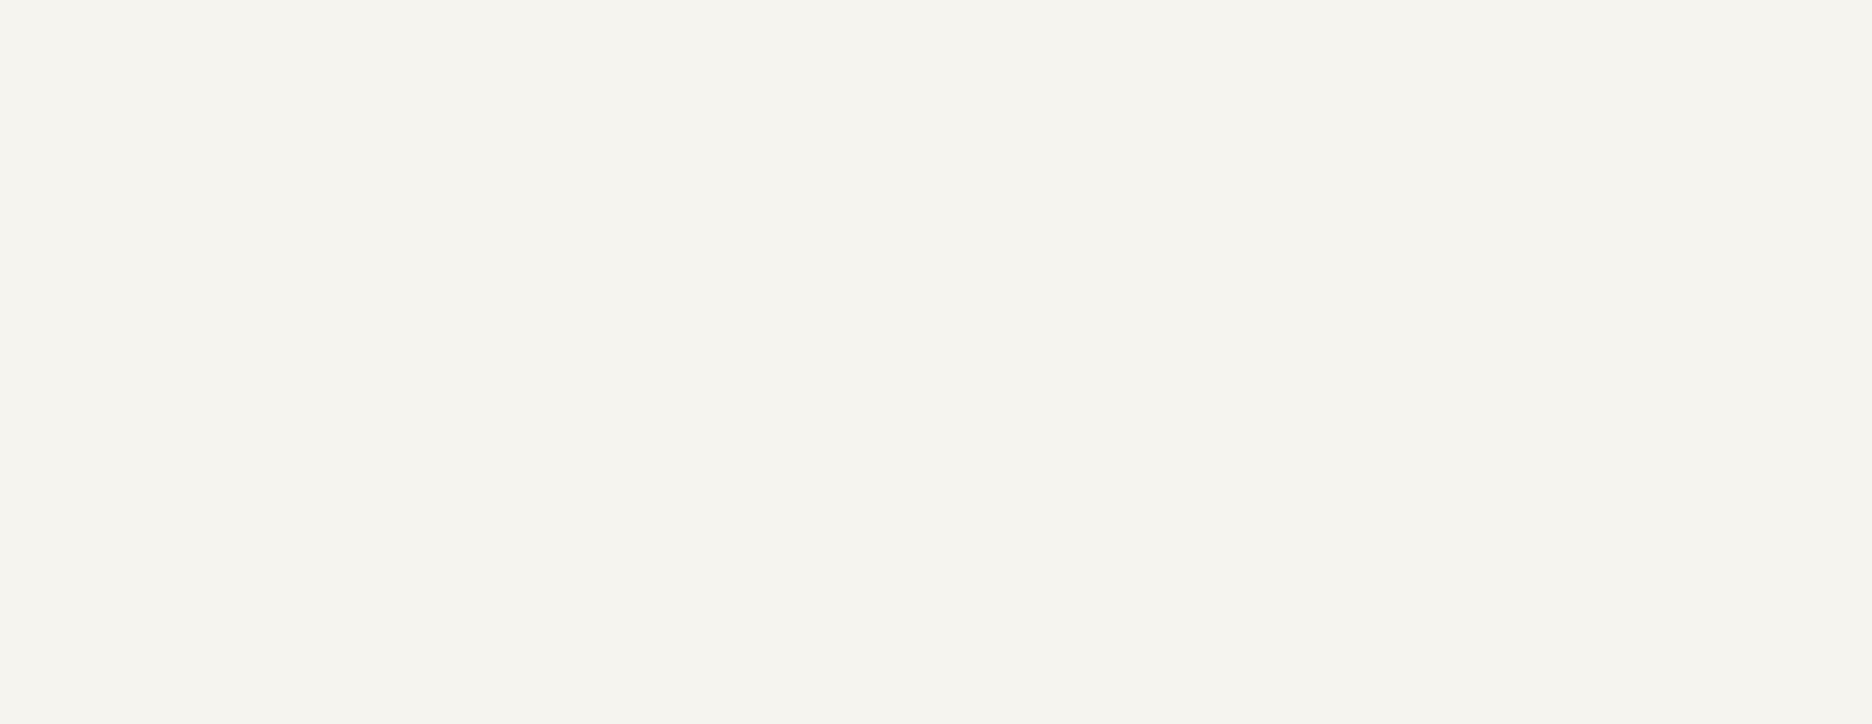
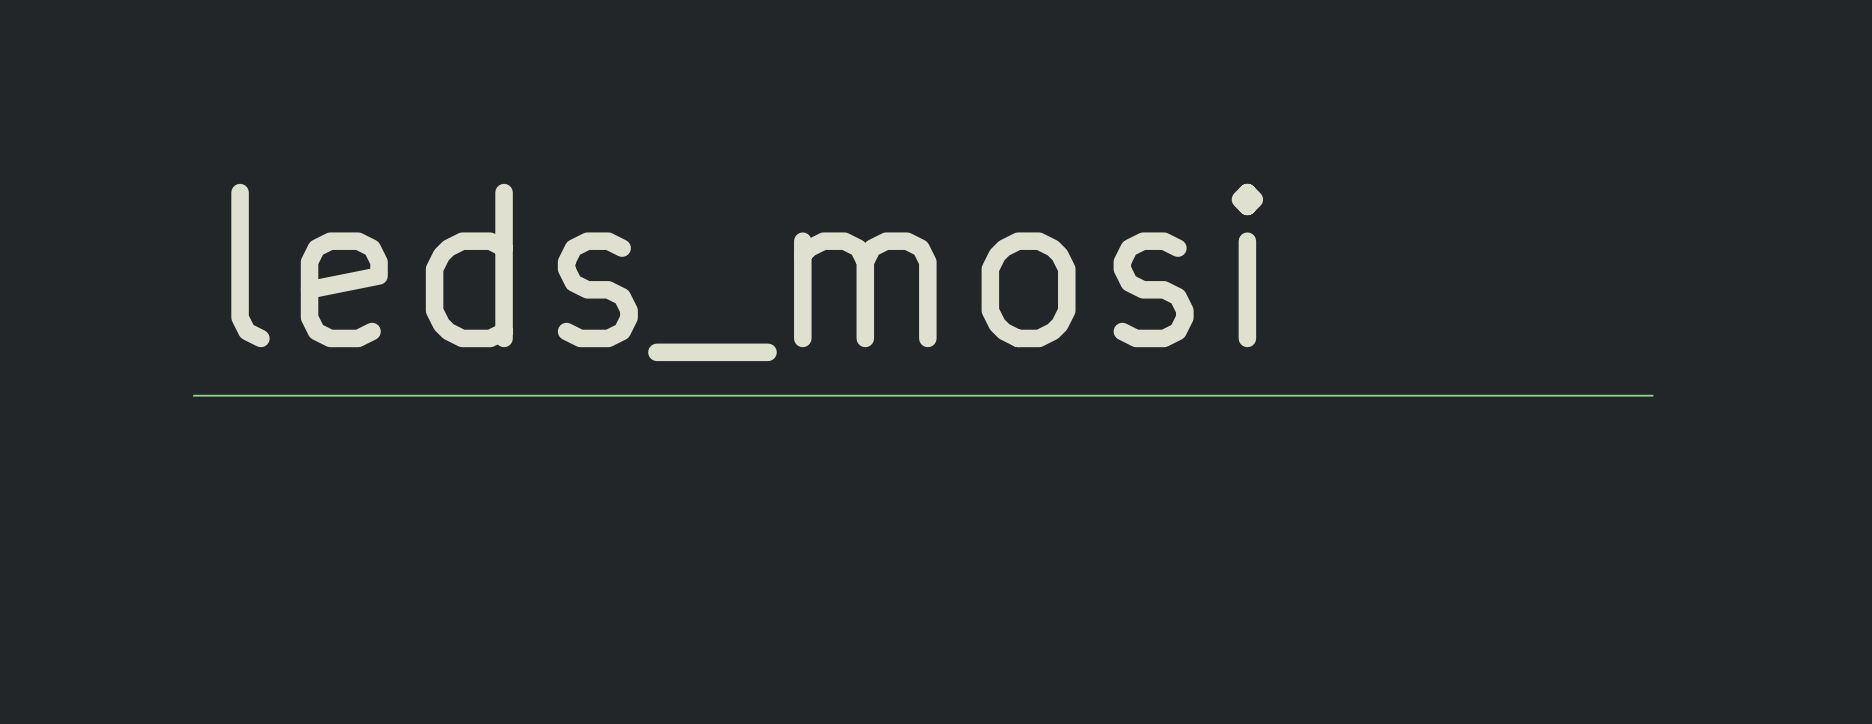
label: none -> leds_mosi (747, 272)
wire: none -> (193, 395) (1652, 395)

